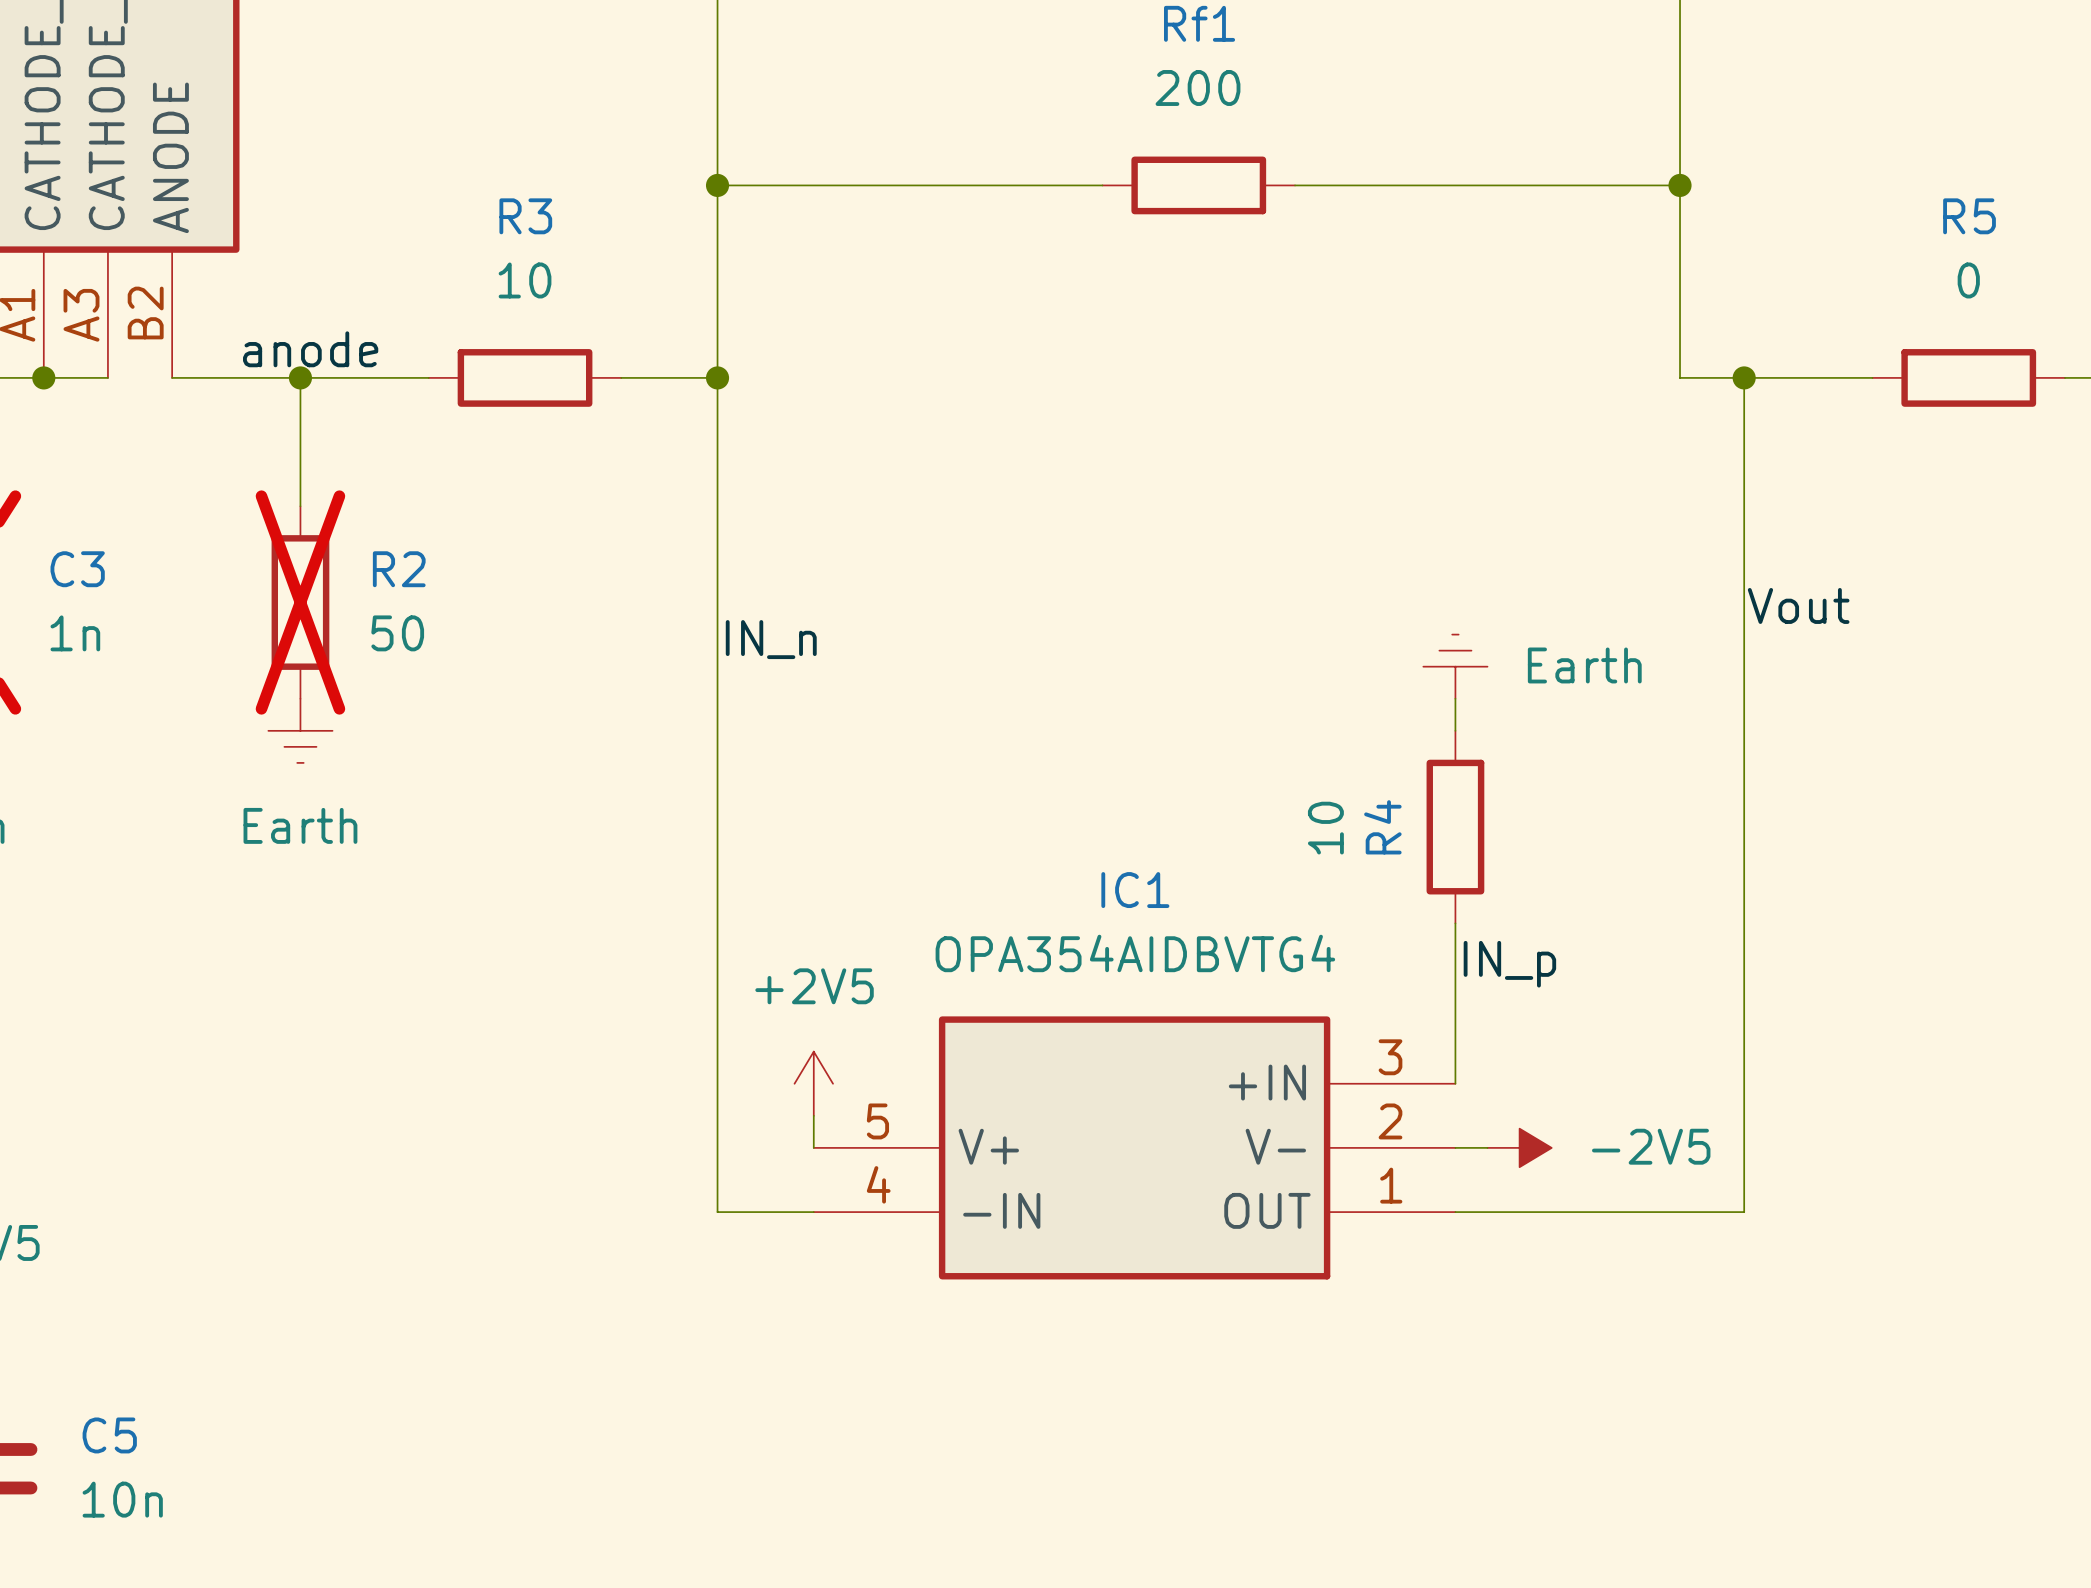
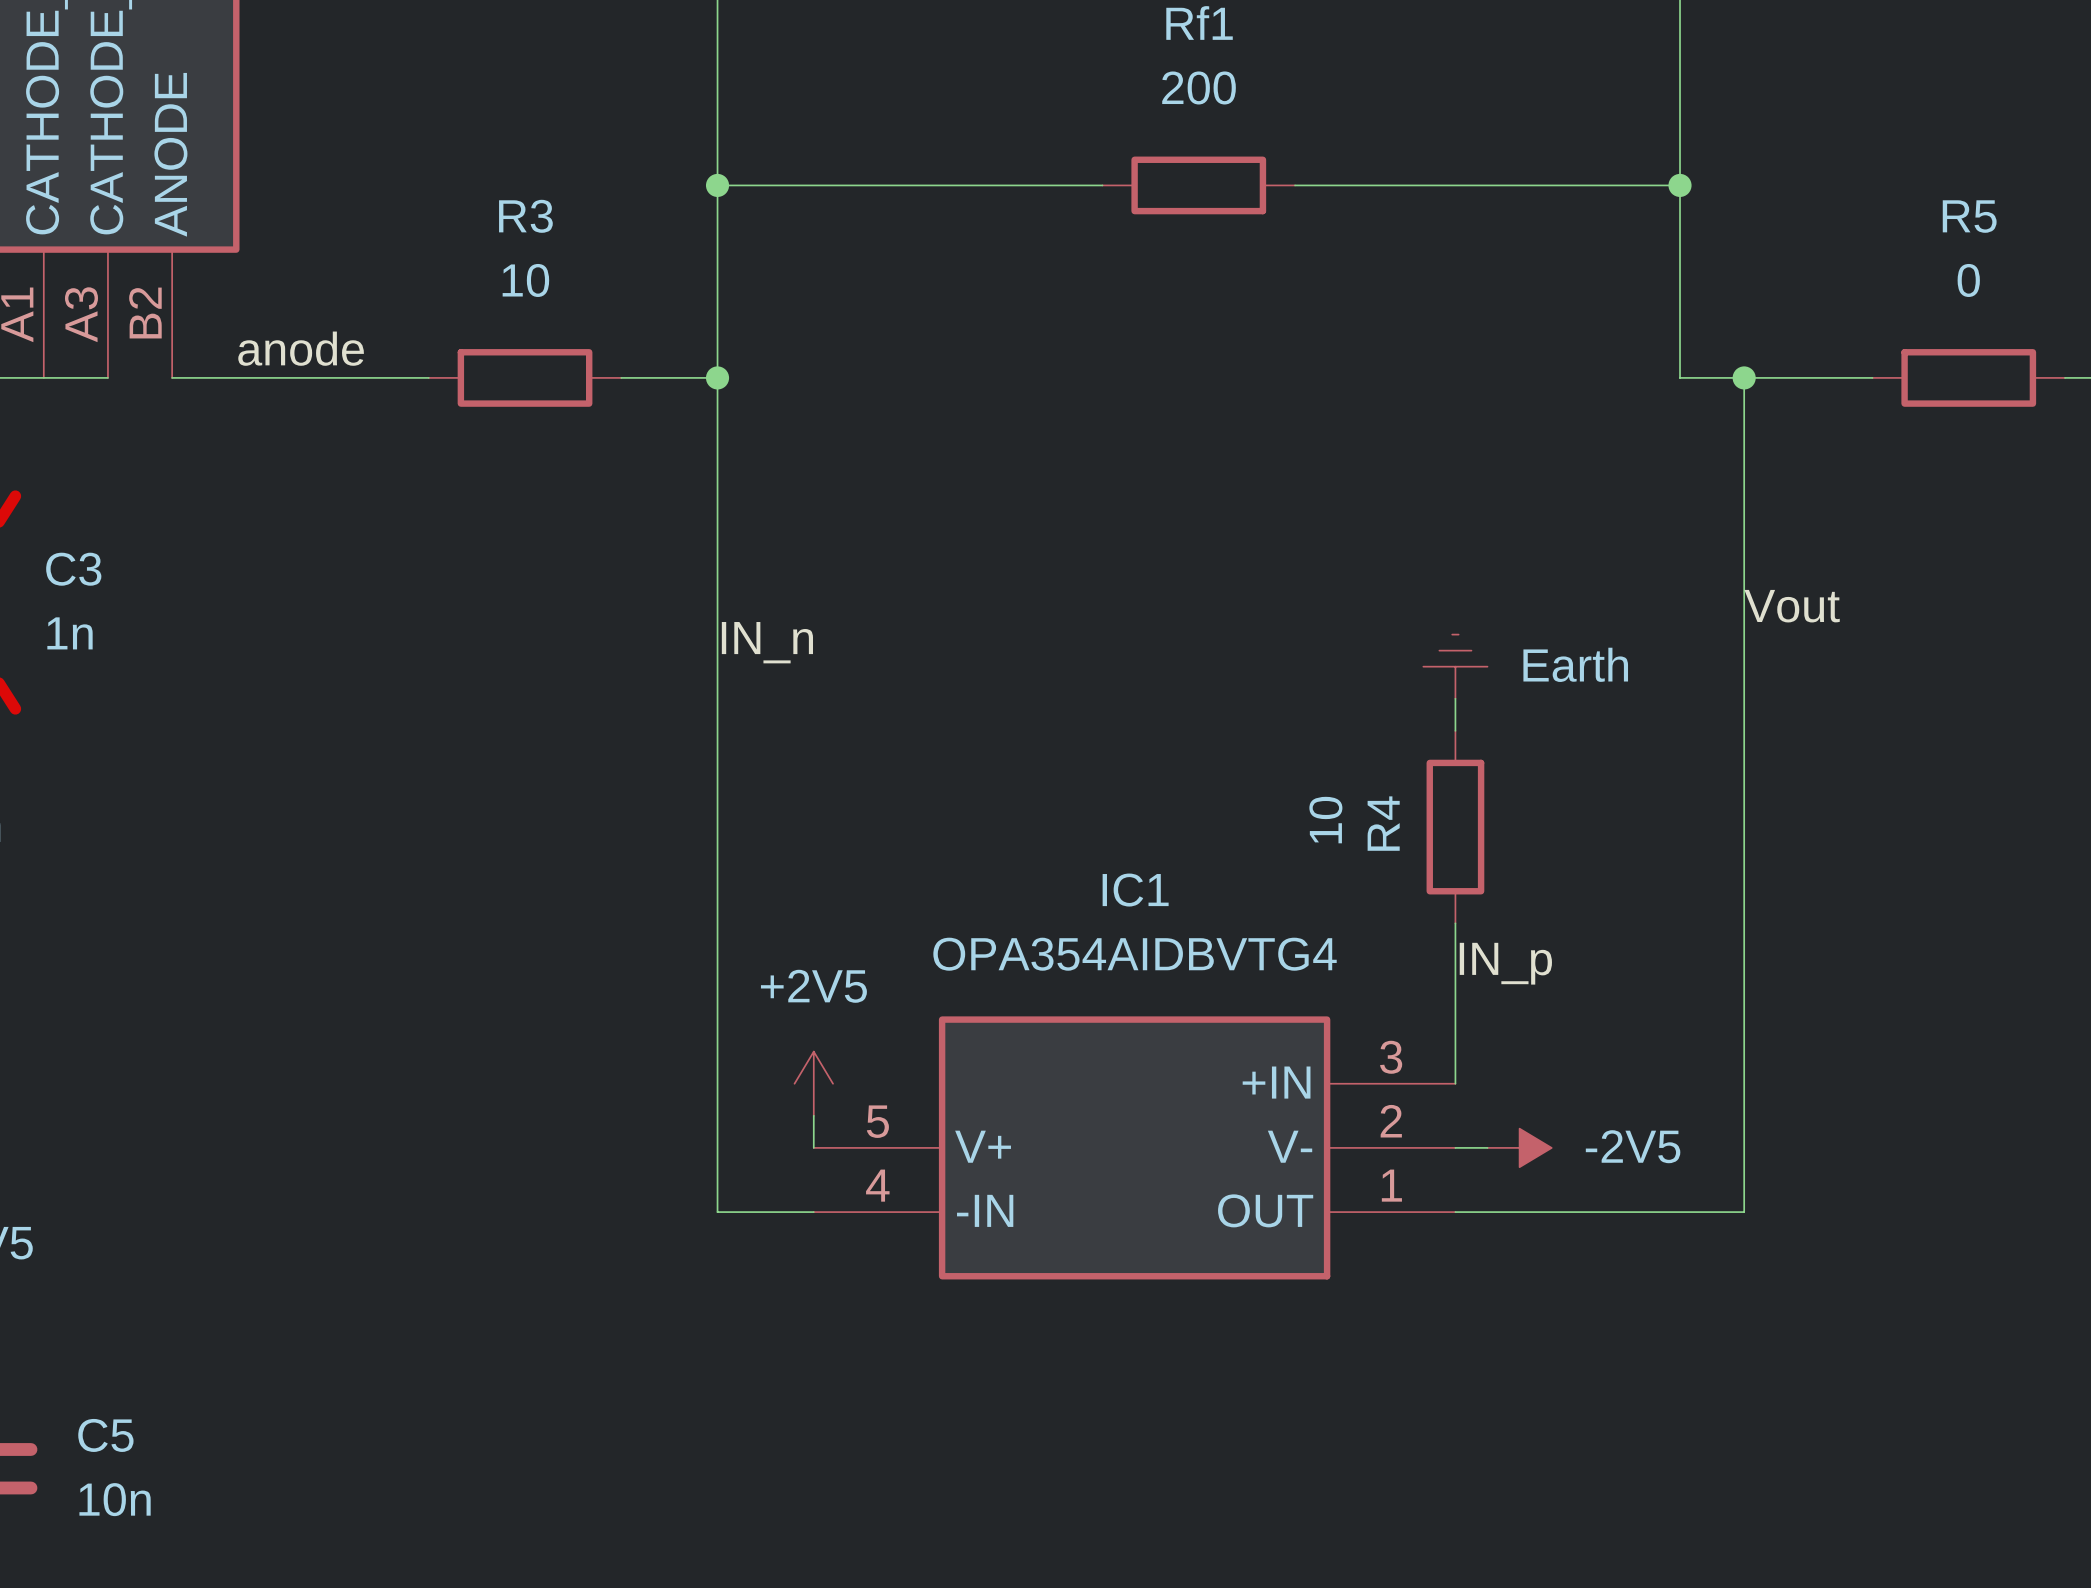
junction: (43, 377) -> none
wire: (300, 377) (300, 506) -> none
junction: (300, 377) -> none
R2: 50 (300, 602) -> none
power symbol: Earth (300, 730) -> none

